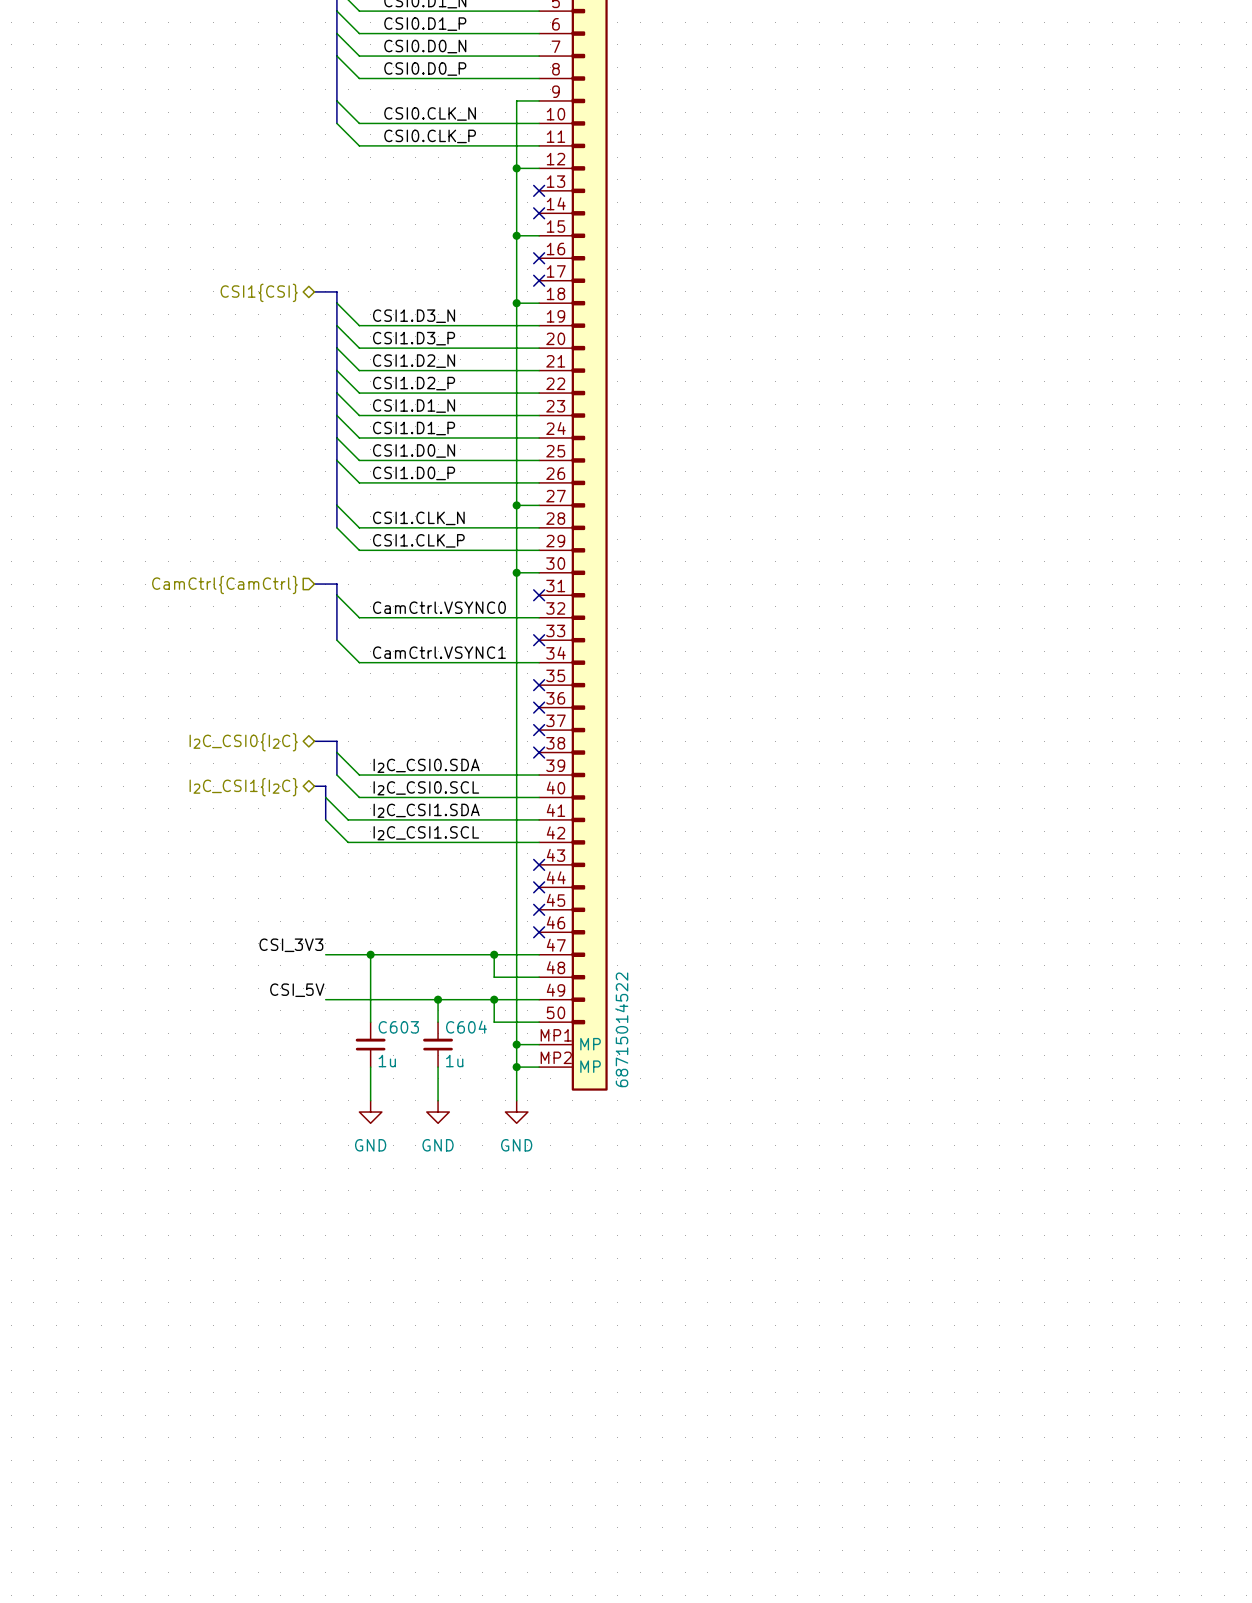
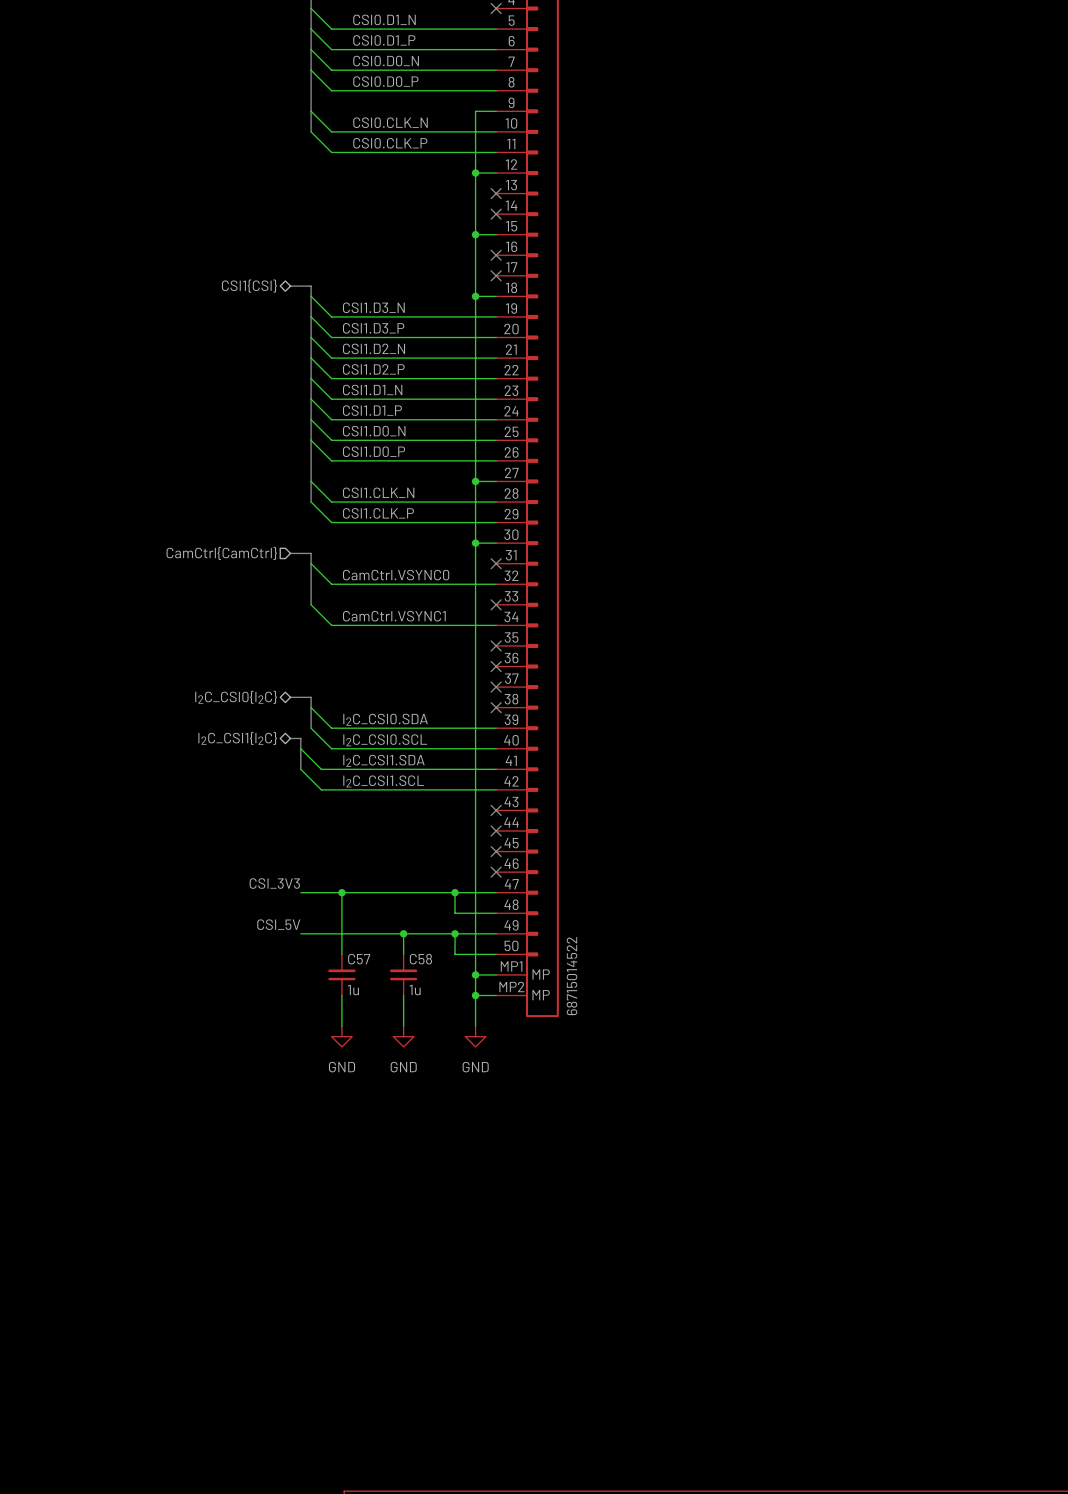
C603 name: C603 (398, 1027) -> C57 (359, 959)
C604 name: C604 (466, 1027) -> C58 (420, 959)

